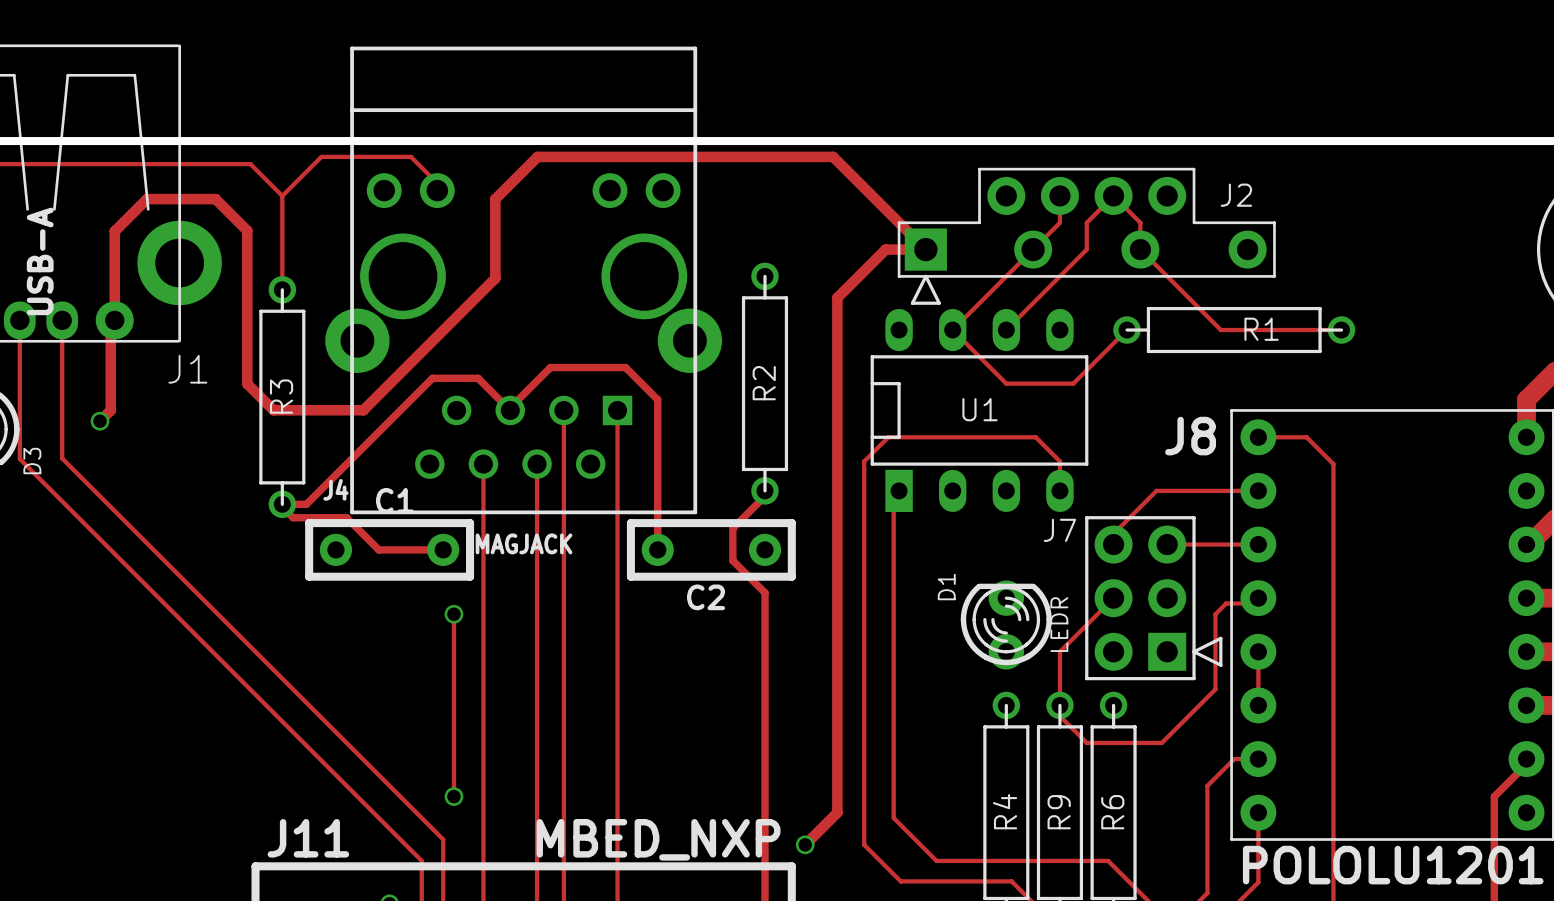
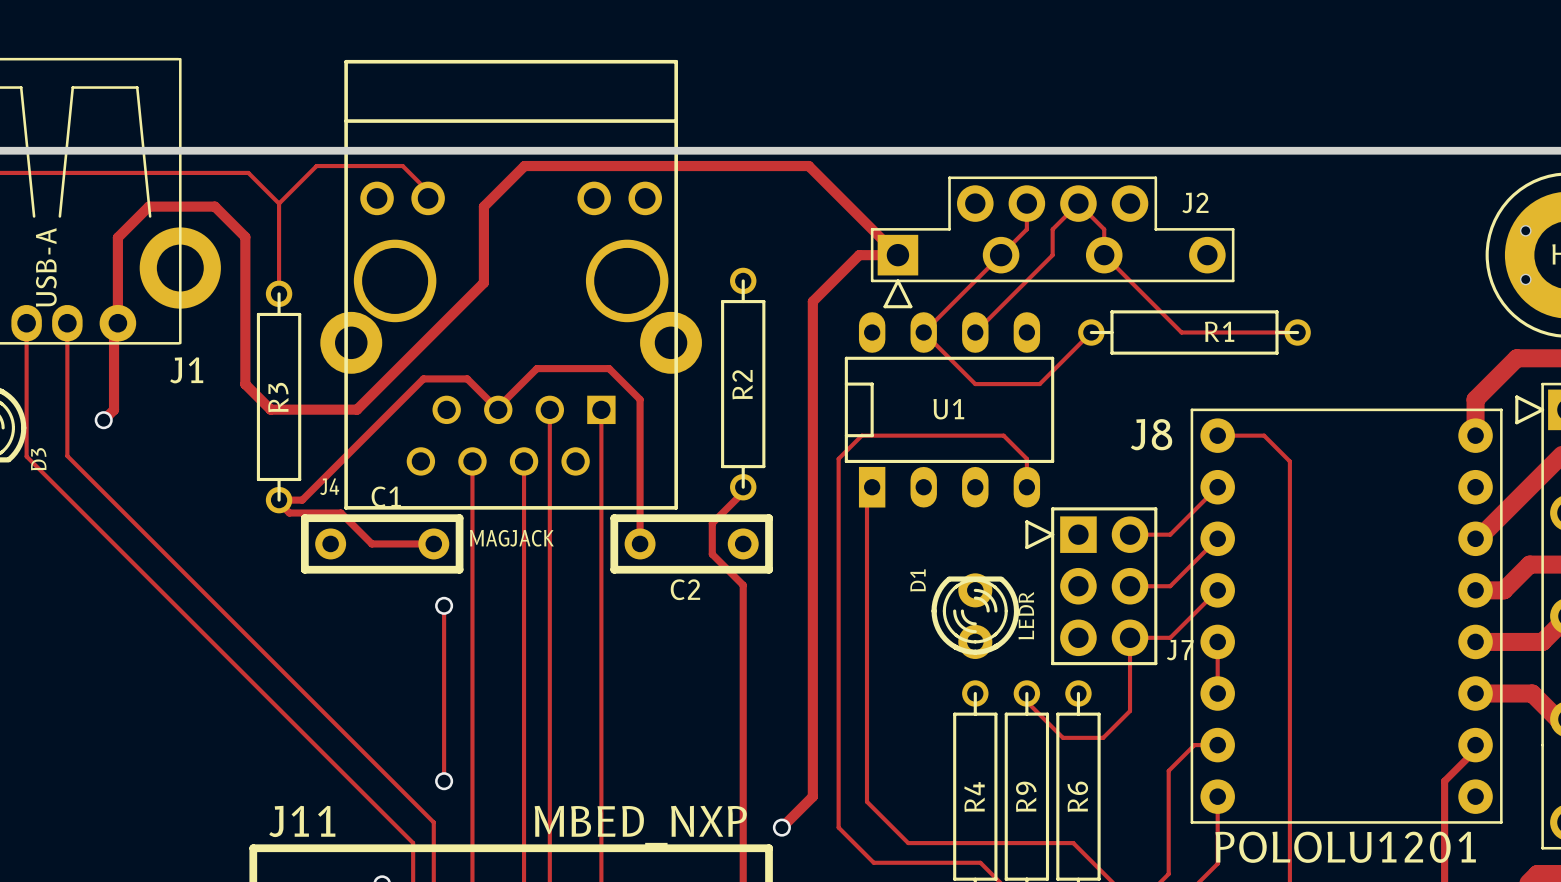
track: (1258, 490) (1156, 490) (1113, 533) (1113, 540) -> (1217, 487) (1170, 534) (1130, 534)
track: (1167, 544) (1258, 544) -> (1130, 586) (1170, 586) (1217, 538)
track: (1113, 598) (1059, 651) (1059, 705) -> none
J7 rotation: 0° (1153, 598) -> 180° (1091, 586)
track: (1253, 603) (1226, 603) (1215, 614) (1215, 689) (1161, 742) (1086, 742) (1059, 714) -> (1212, 595) (1170, 637) (1130, 637) (1130, 711) (1103, 737) (1062, 737) (1026, 701)

